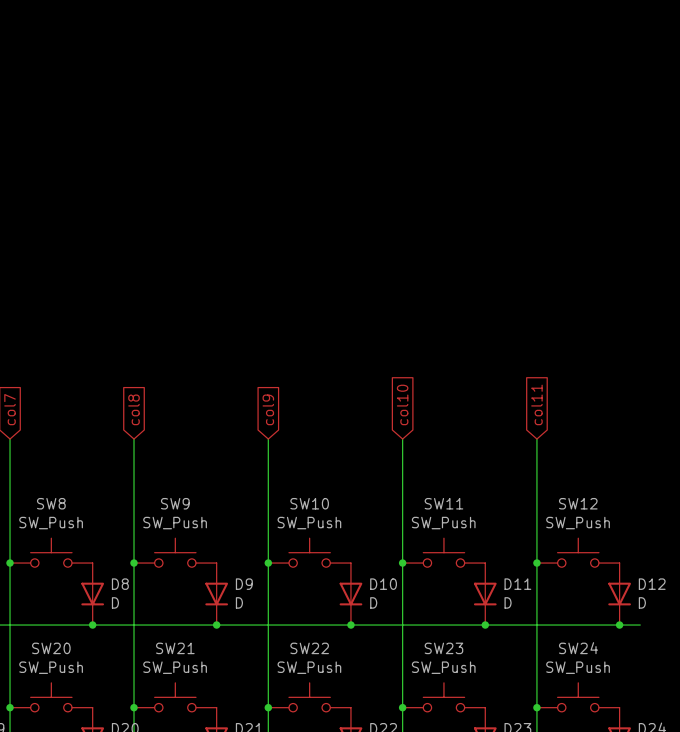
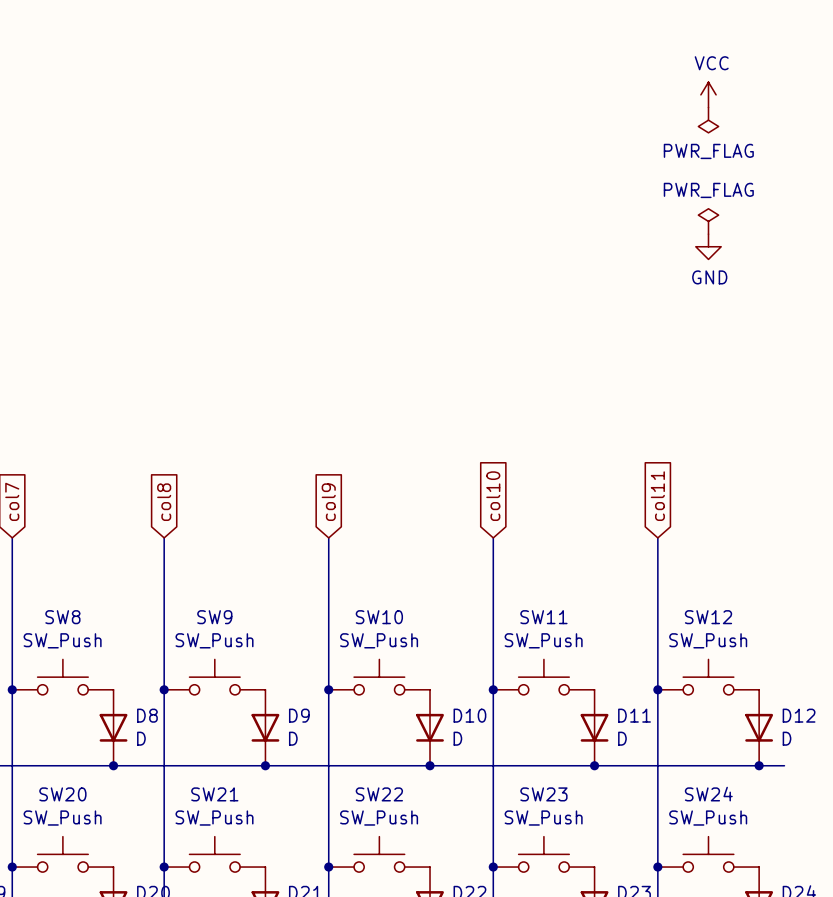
power symbol: none -> VCC (708, 94)
power symbol: none -> PWR_FLAG (708, 120)
power symbol: none -> PWR_FLAG (708, 221)
power symbol: none -> GND (708, 246)

